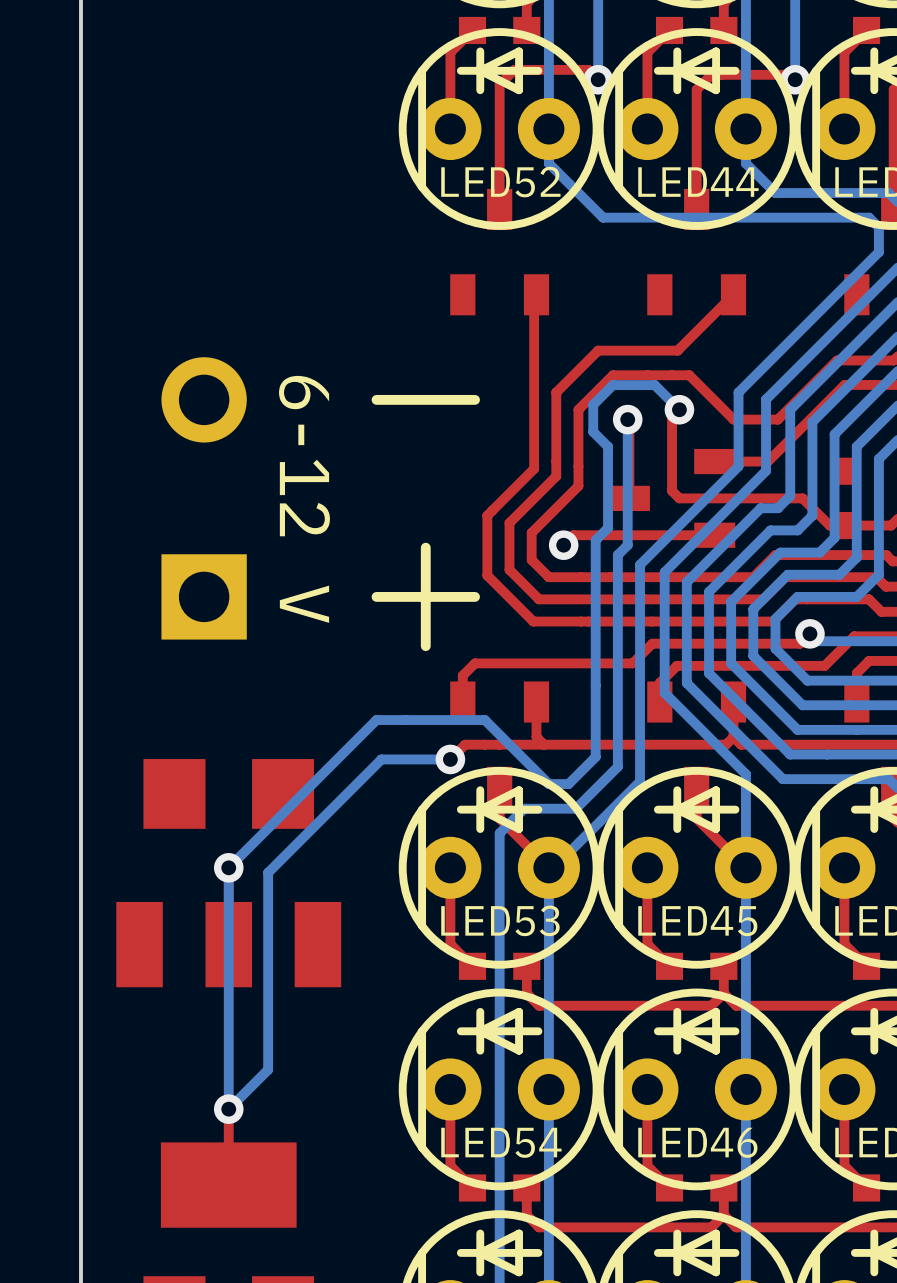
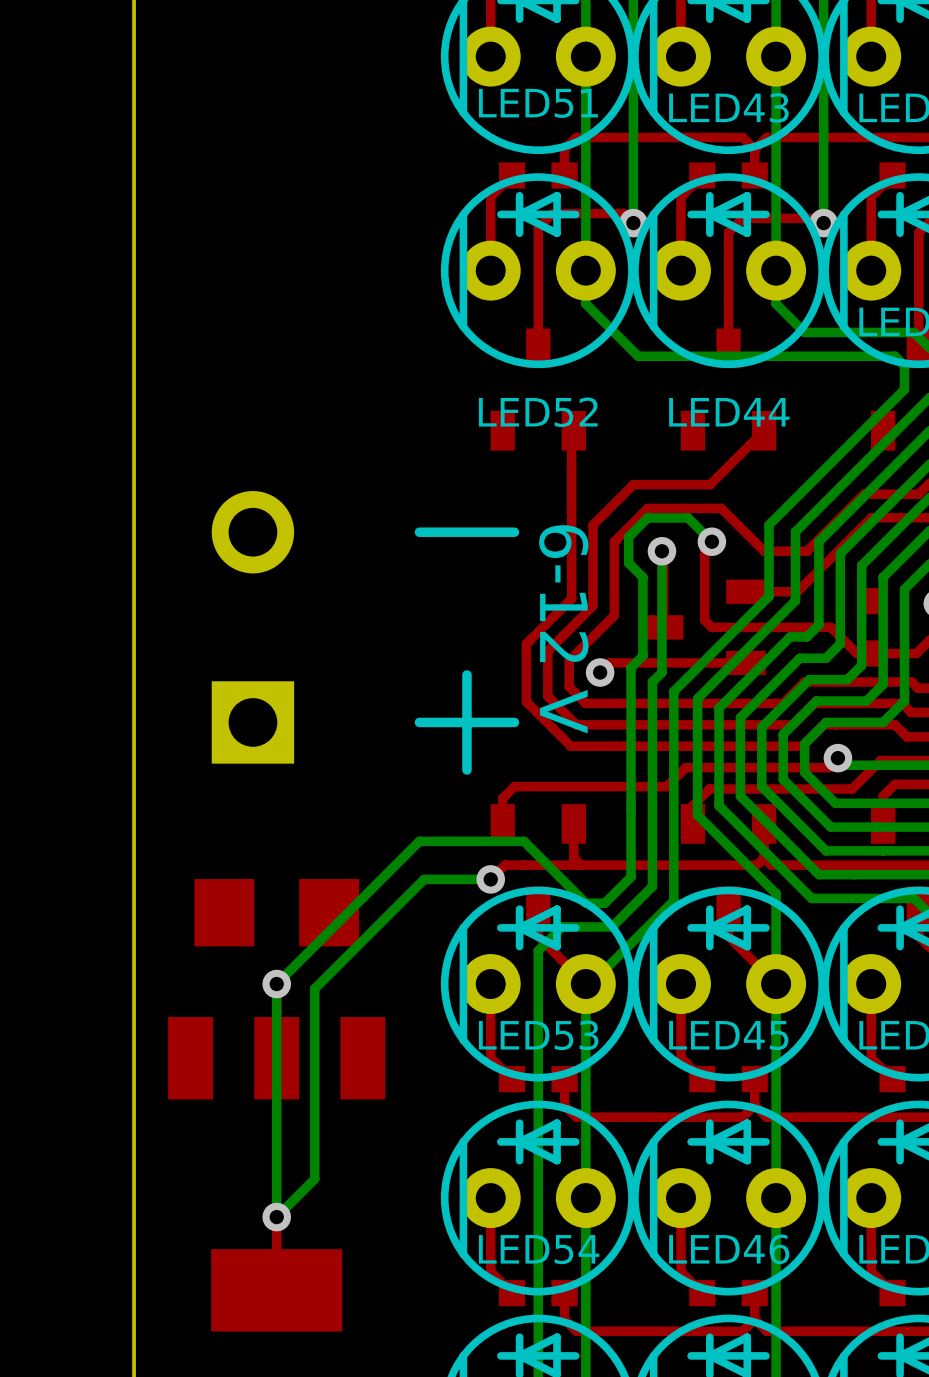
LED52 name position: LED52 (500, 182) -> LED52 (538, 412)
LED44 name position: LED44 (698, 182) -> LED44 (729, 412)
text position: 6-12 V (304, 499) -> 6-12 V (563, 629)

